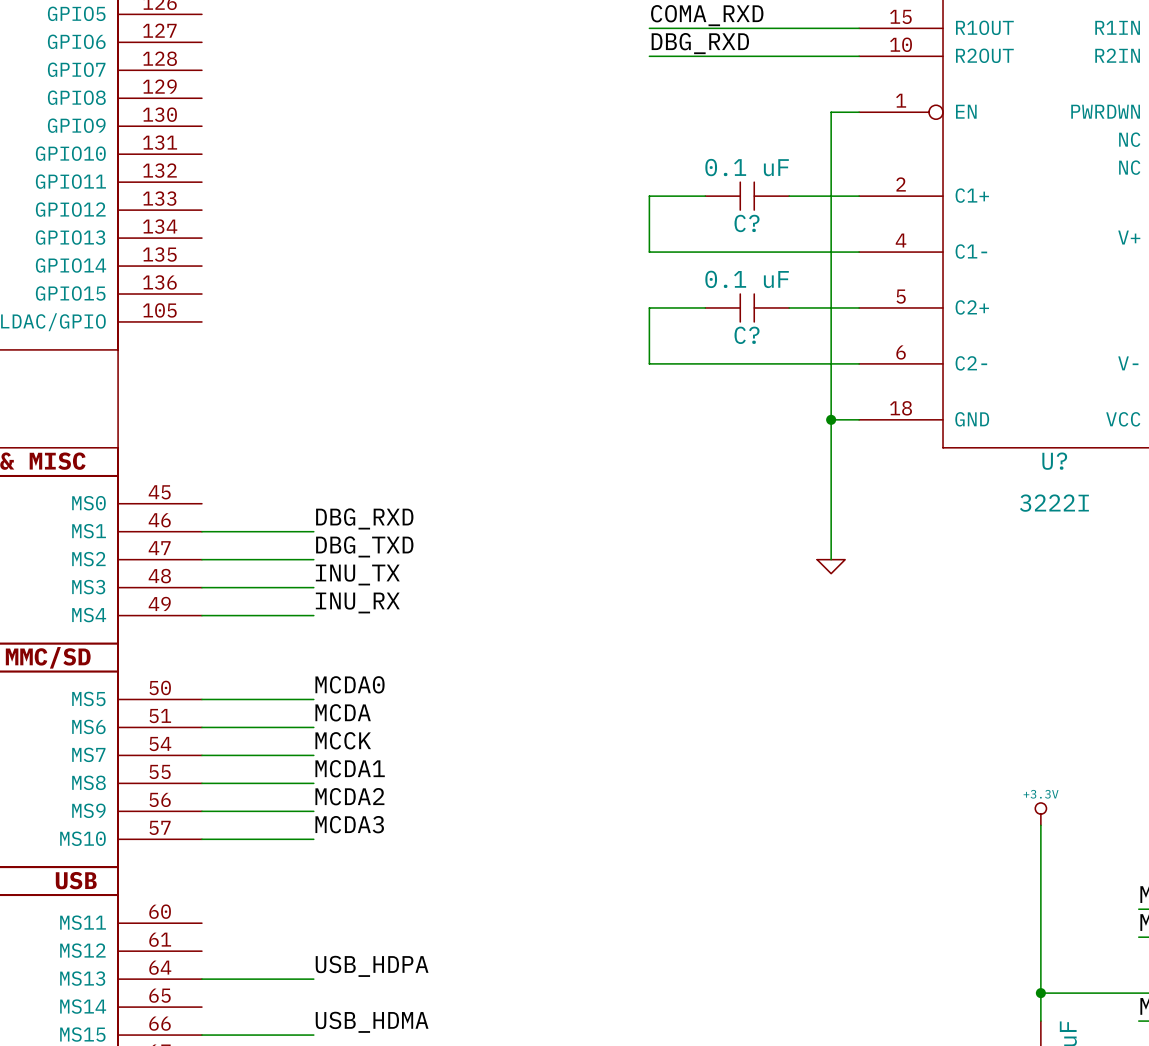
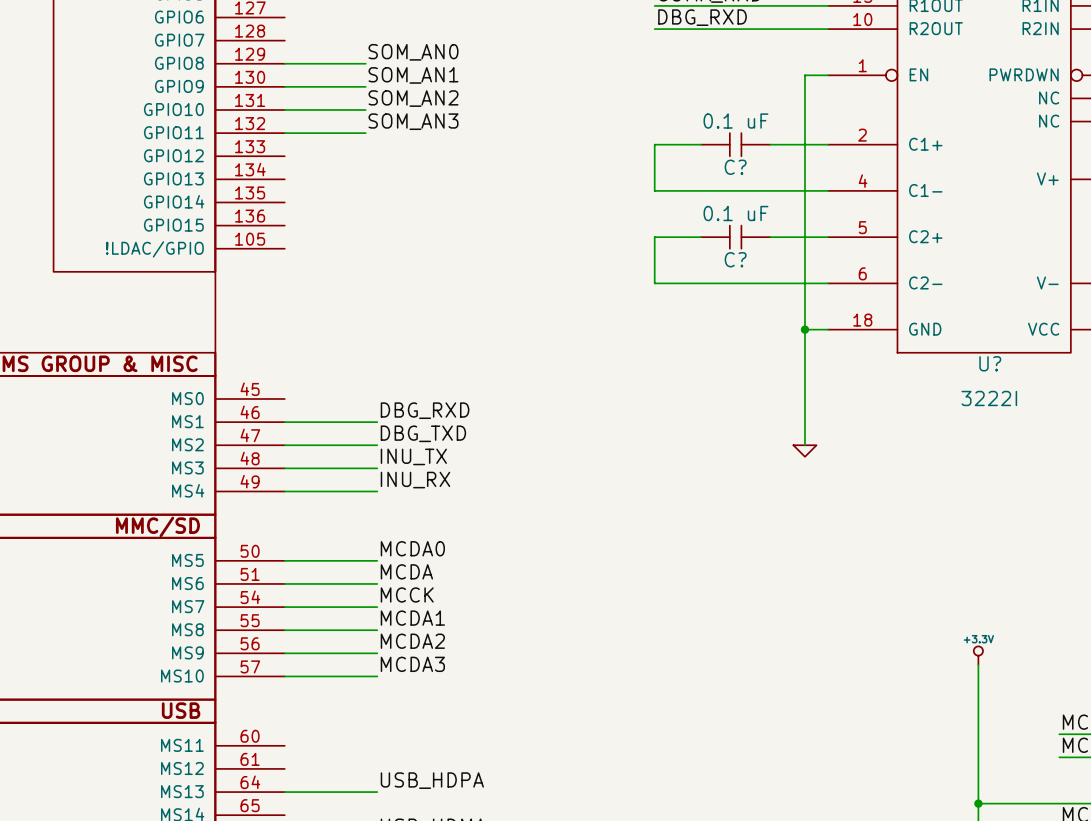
label: none -> SOM_AN0 (413, 52)
wire: none -> (284, 63) (365, 63)
label: none -> SOM_AN1 (413, 75)
wire: none -> (284, 86) (365, 86)
label: none -> SOM_AN2 (413, 98)
wire: none -> (284, 109) (365, 109)
label: none -> SOM_AN3 (413, 121)
wire: none -> (284, 133) (365, 133)

